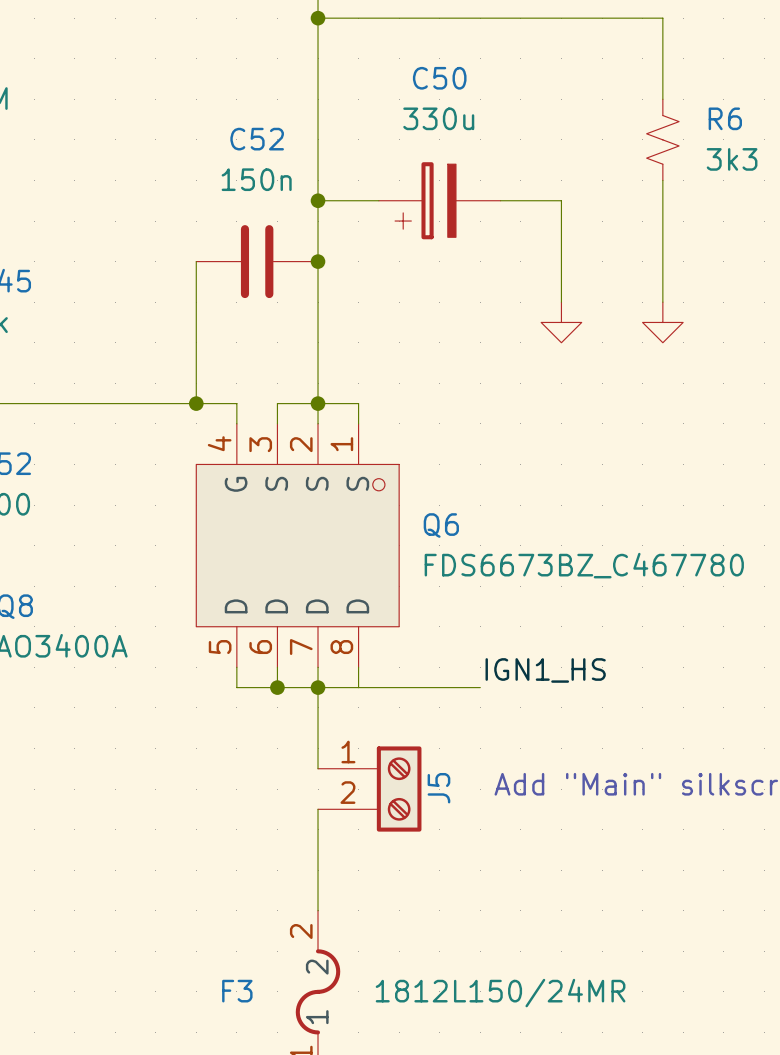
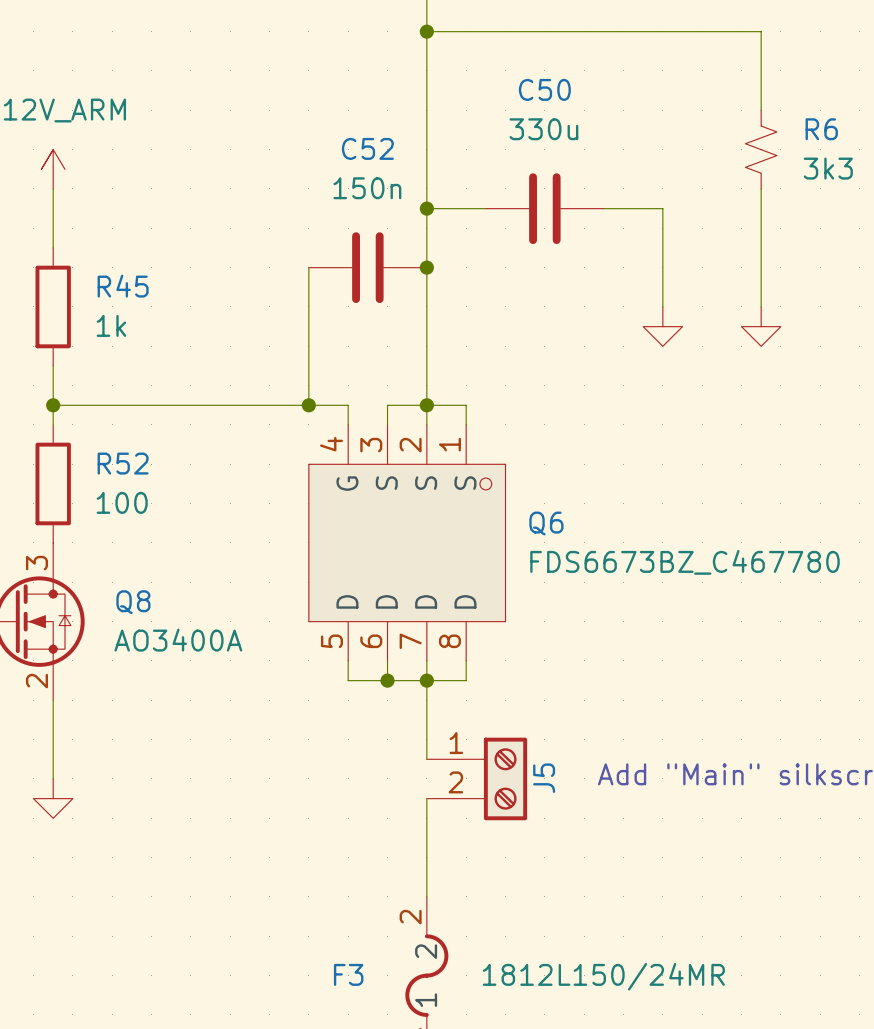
C50 symbol: [378, 162, 501, 240] -> [485, 173, 604, 245]
label: IGN1_HS (545, 670) -> none
wire: (358, 687) (480, 687) -> none

